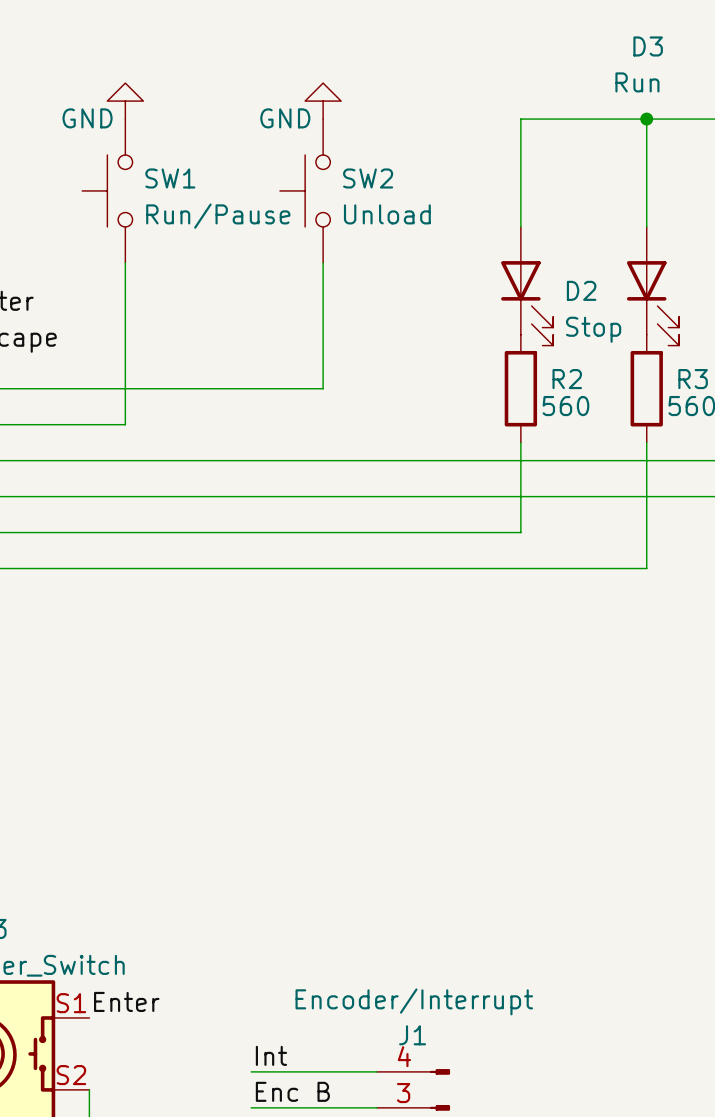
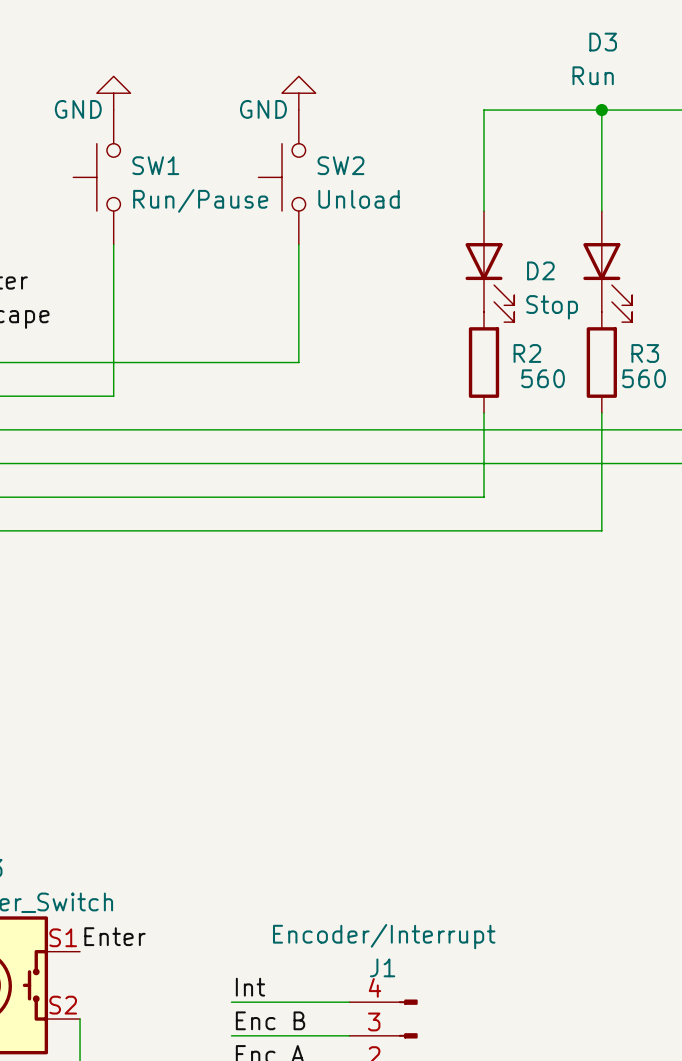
R2 value position: 560 (565, 406) -> 560 (543, 378)

